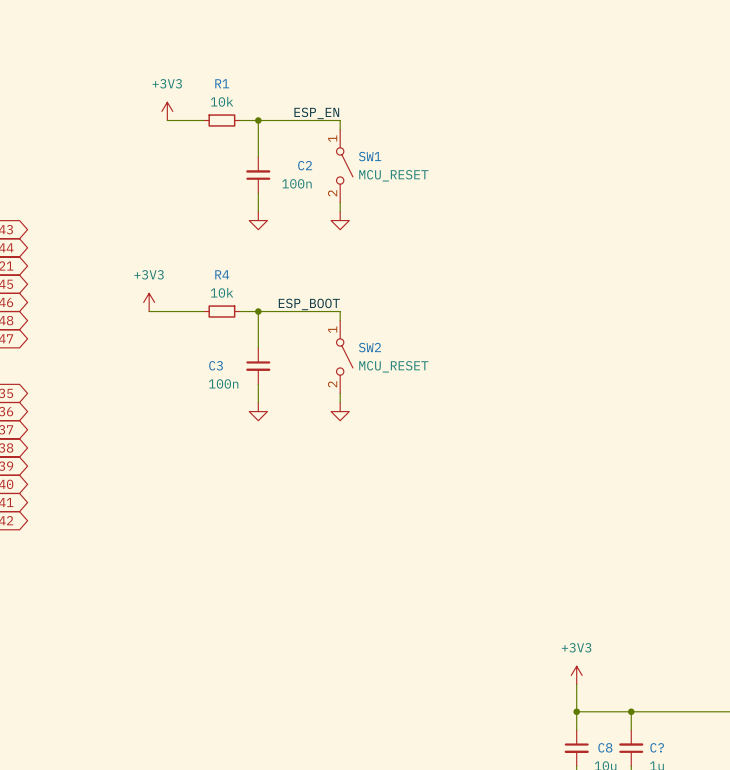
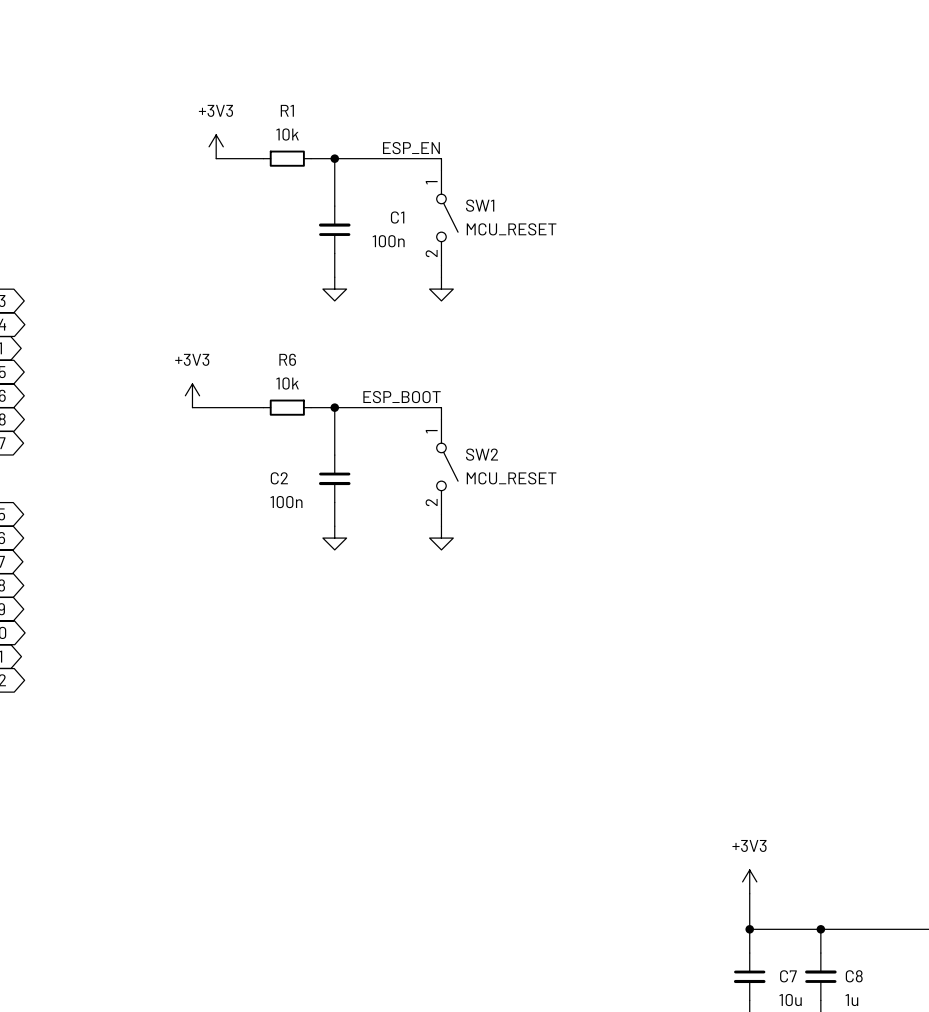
C2 name: C2 (305, 165) -> C1 (397, 217)
R4 name: R4 (222, 274) -> R6 (287, 359)
C3 name: C3 (216, 365) -> C2 (279, 478)
C8 name: C8 (605, 747) -> C7 (788, 976)
C? name: C? (657, 747) -> C8 (854, 976)

